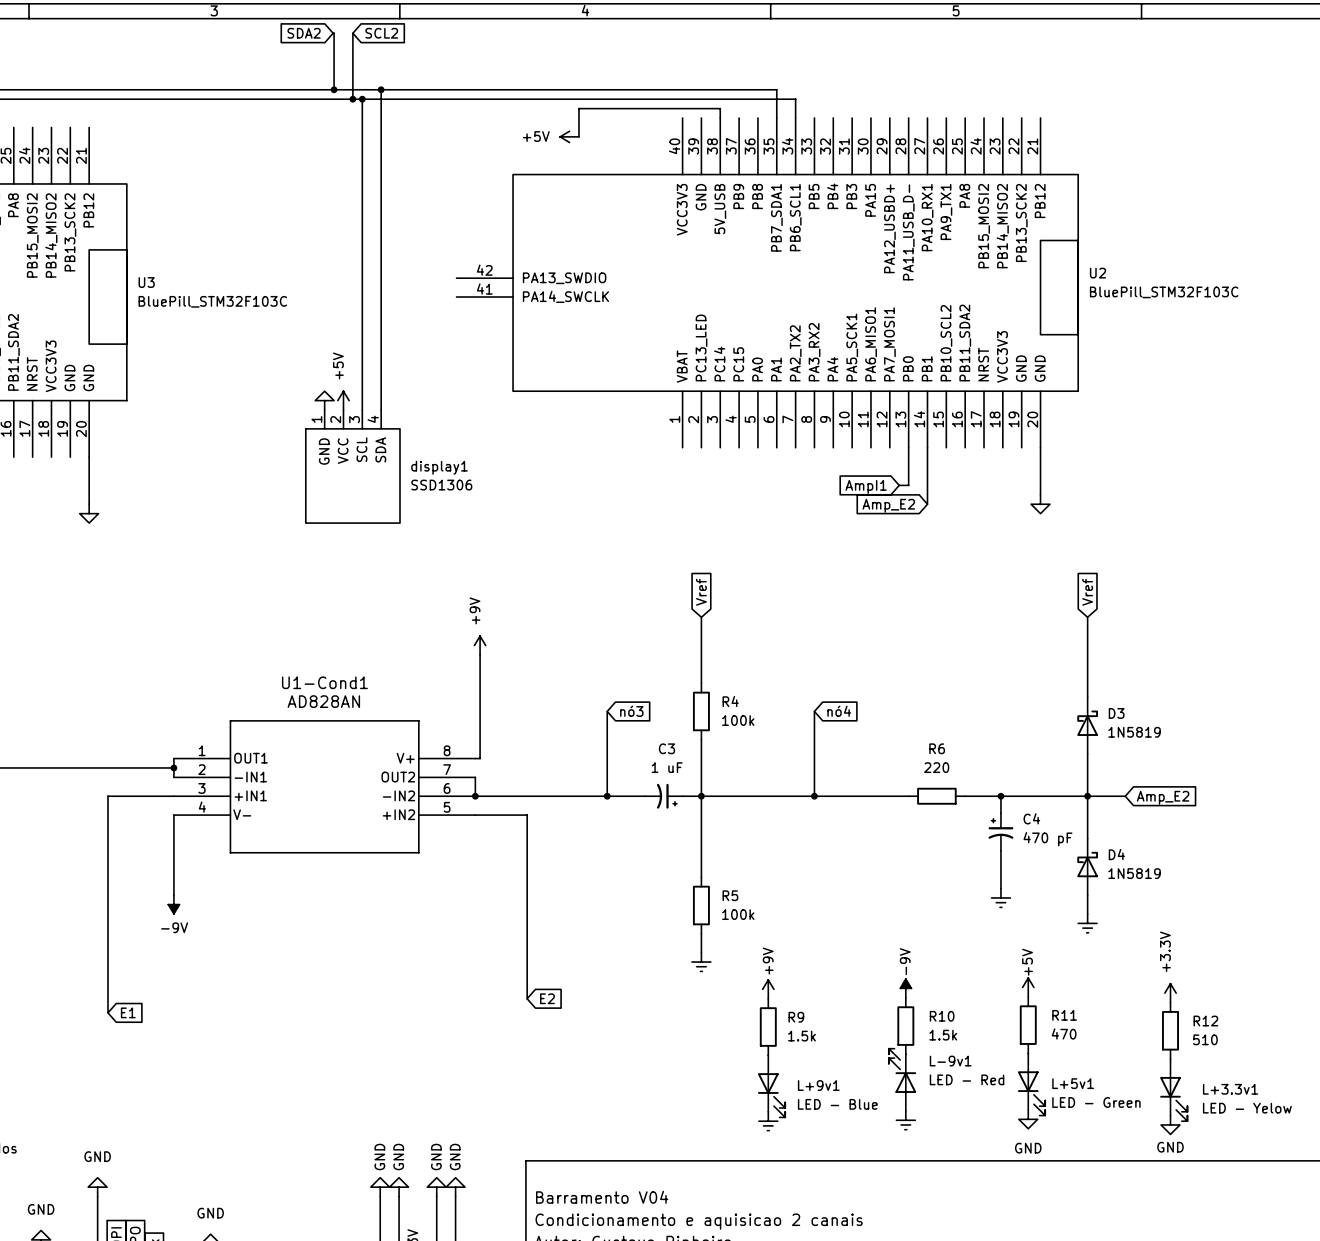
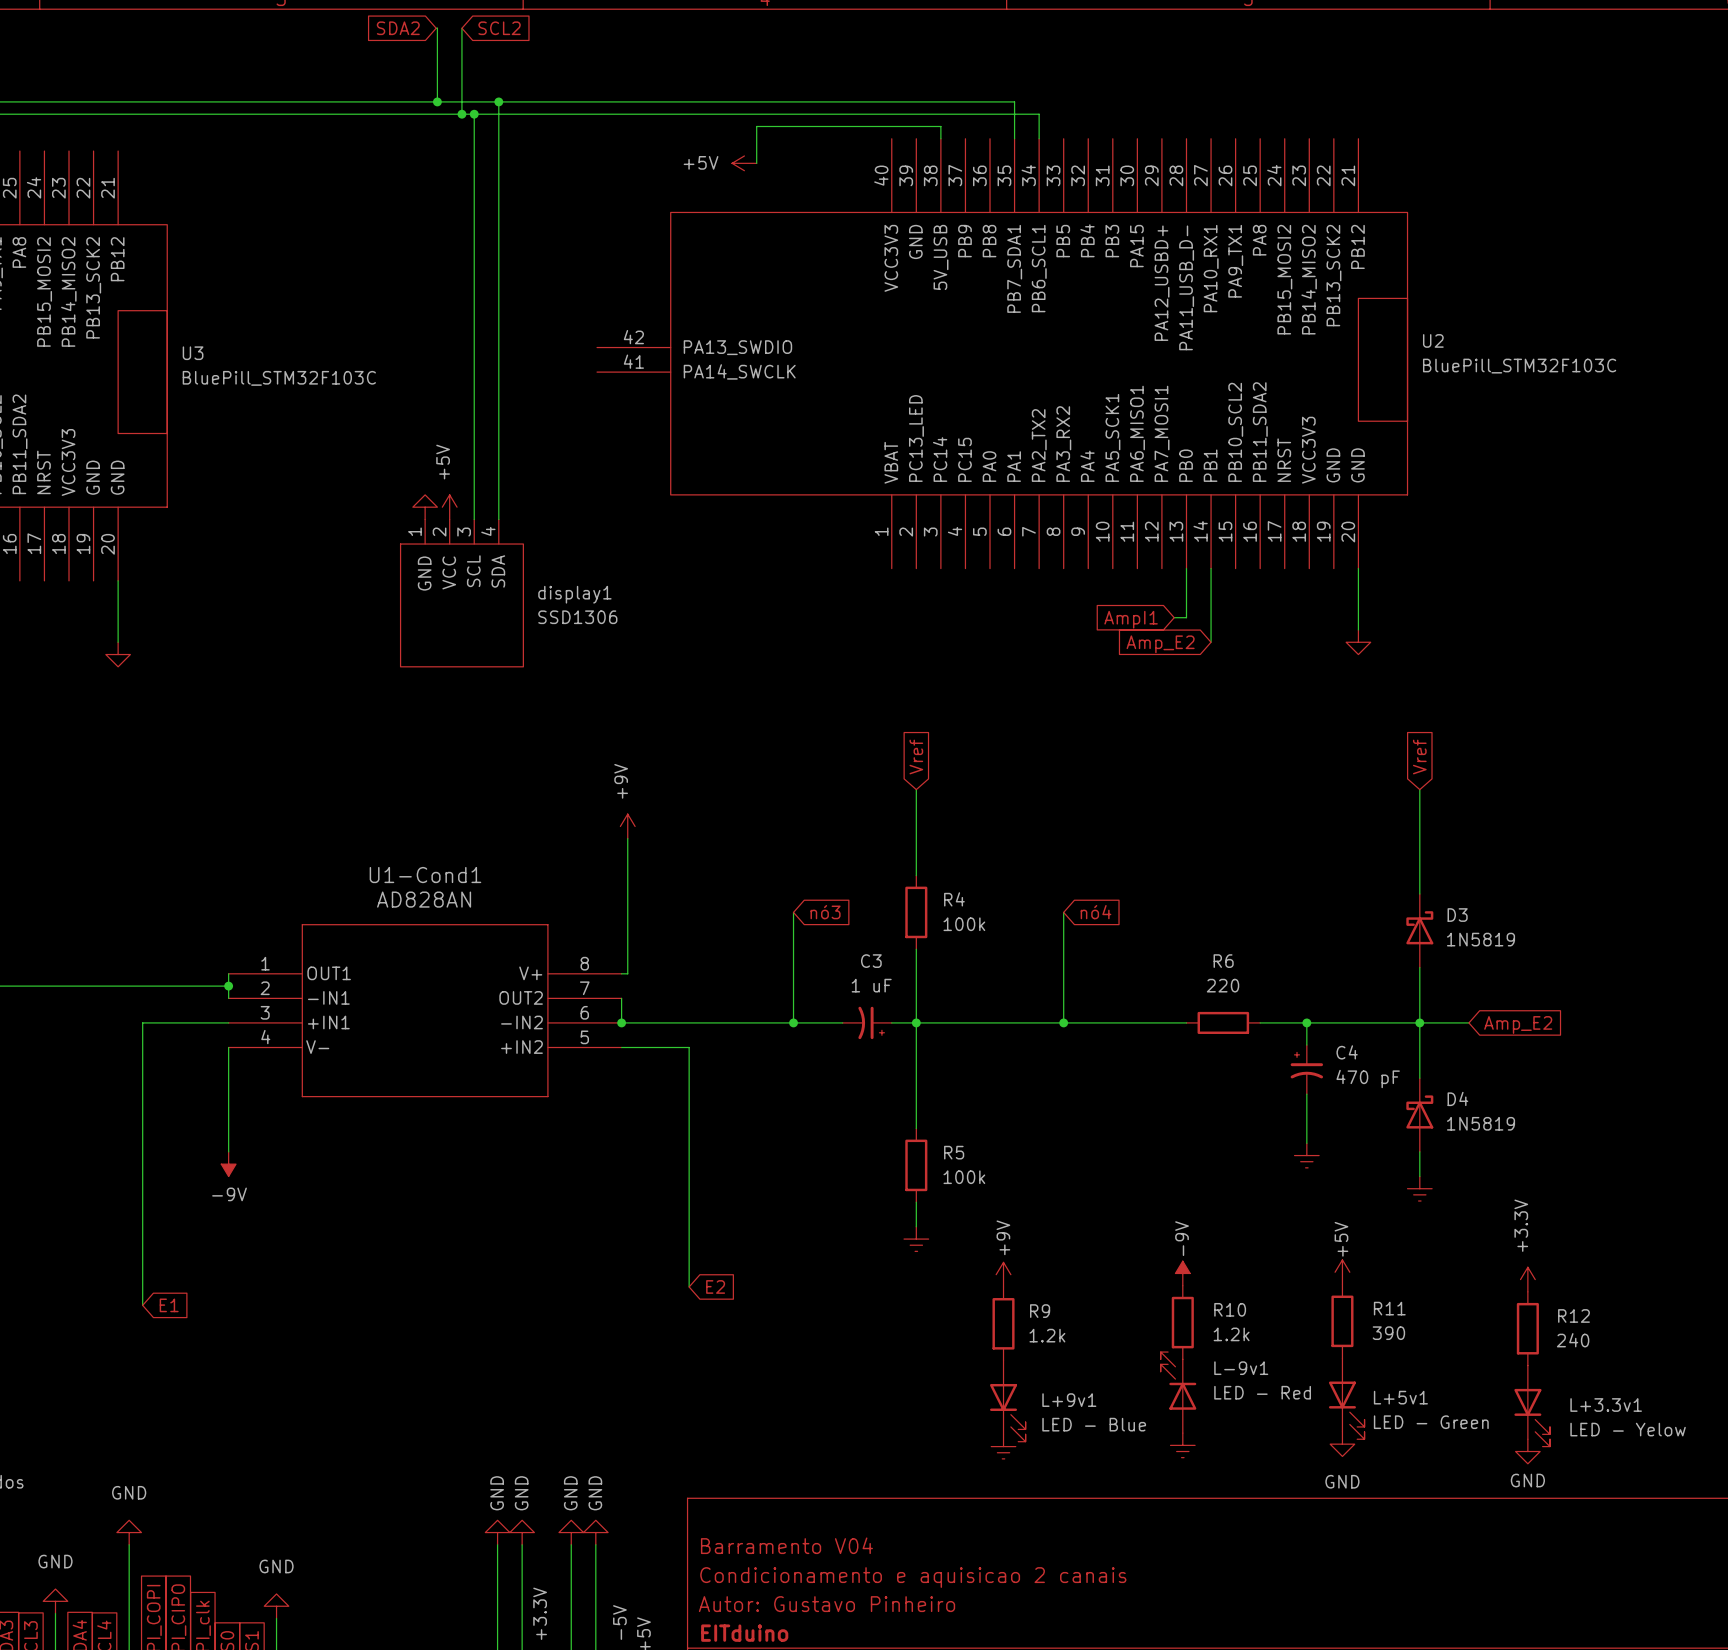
R11 value: 470 (1064, 1033) -> 390 (1388, 1333)
R10 value: 1.5k (943, 1035) -> 1.2k (1231, 1334)
R9 value: 1.5k (801, 1036) -> 1.2k (1047, 1335)
R12 value: 510 (1205, 1039) -> 240 (1573, 1340)

